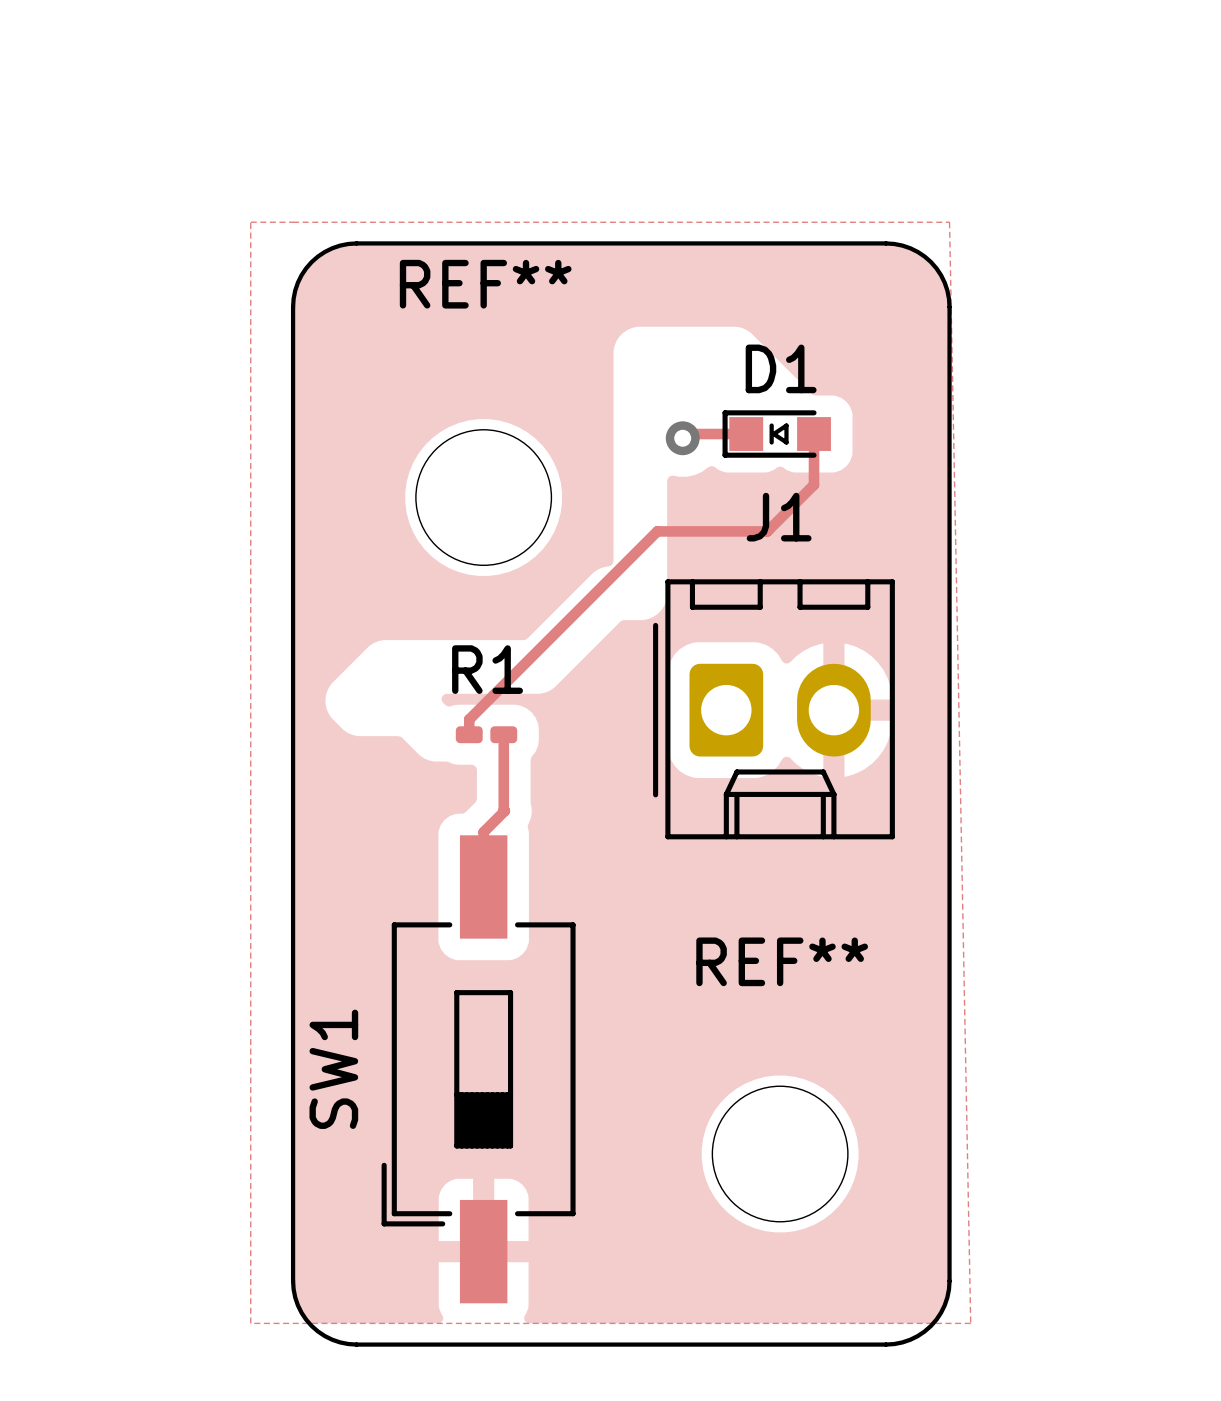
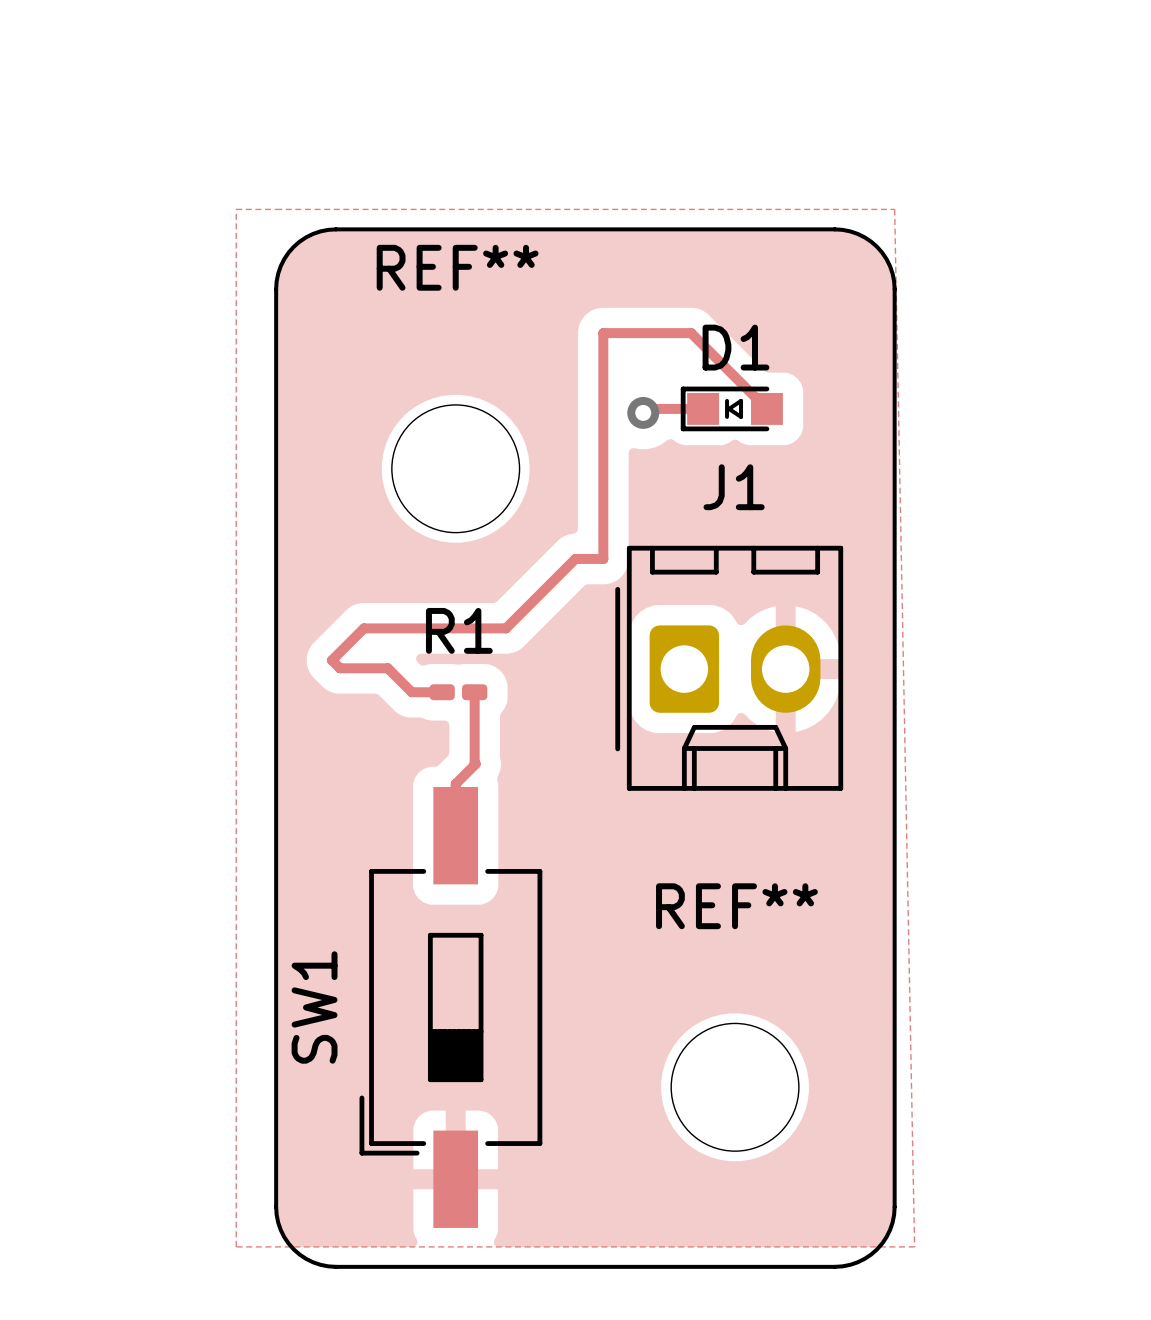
track: (814, 434) (814, 484) (767, 531) (657, 531) (469, 719) (469, 734) -> (766, 408) (691, 333) (603, 333) (603, 558) (575, 558) (505, 628) (363, 628) (332, 660) (339, 668) (387, 668) (411, 692) (442, 692)

